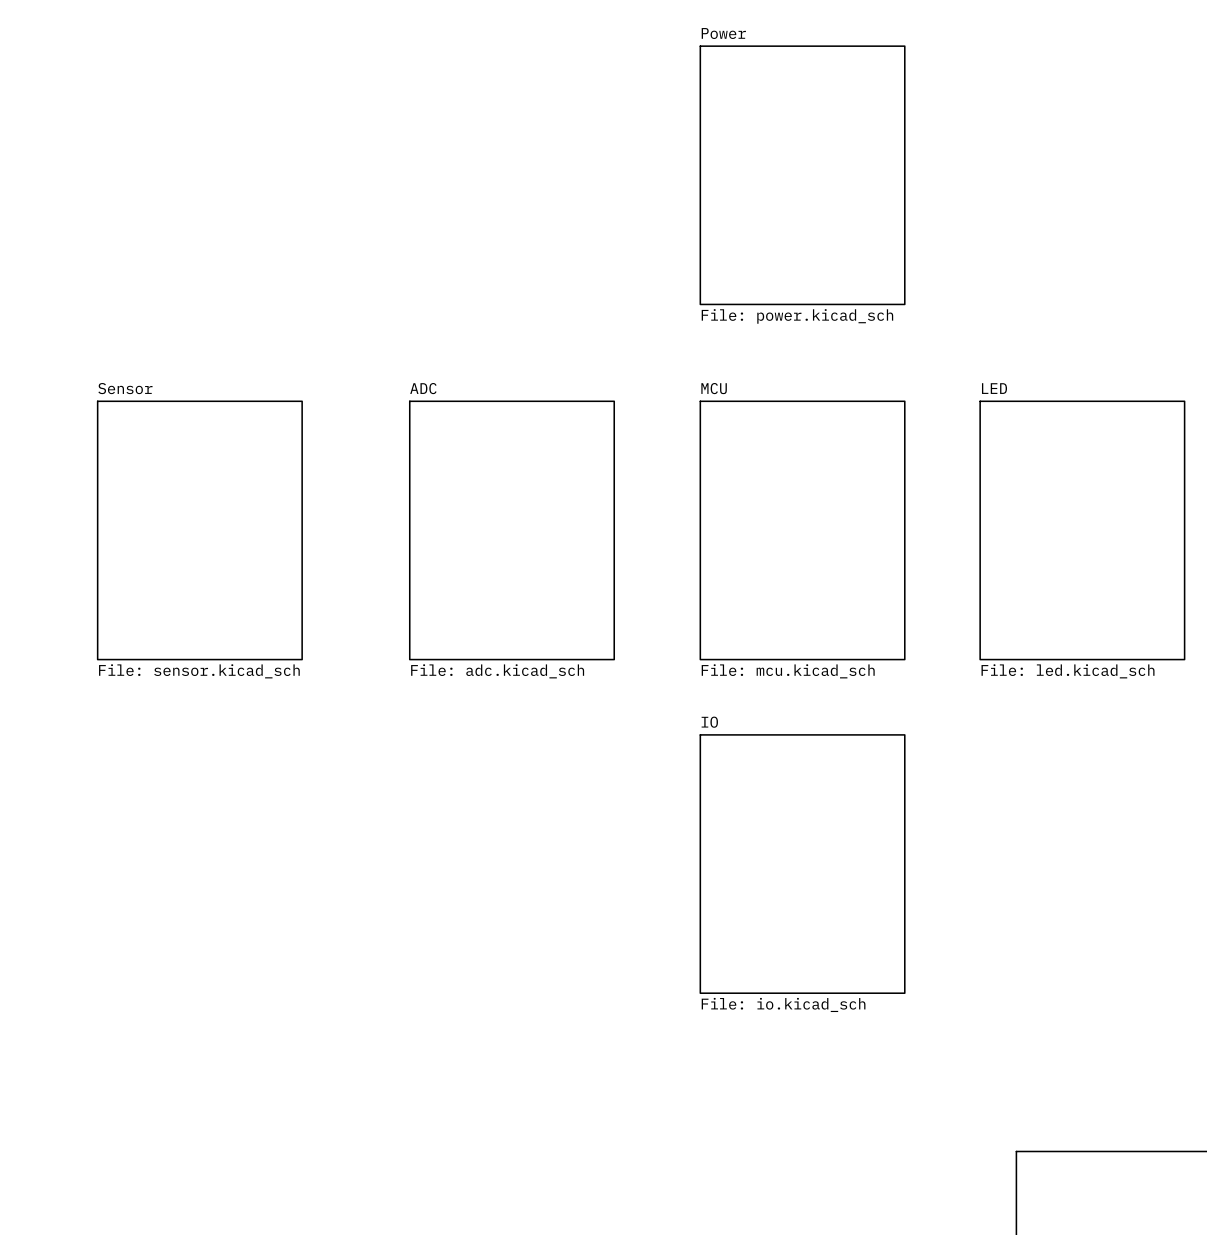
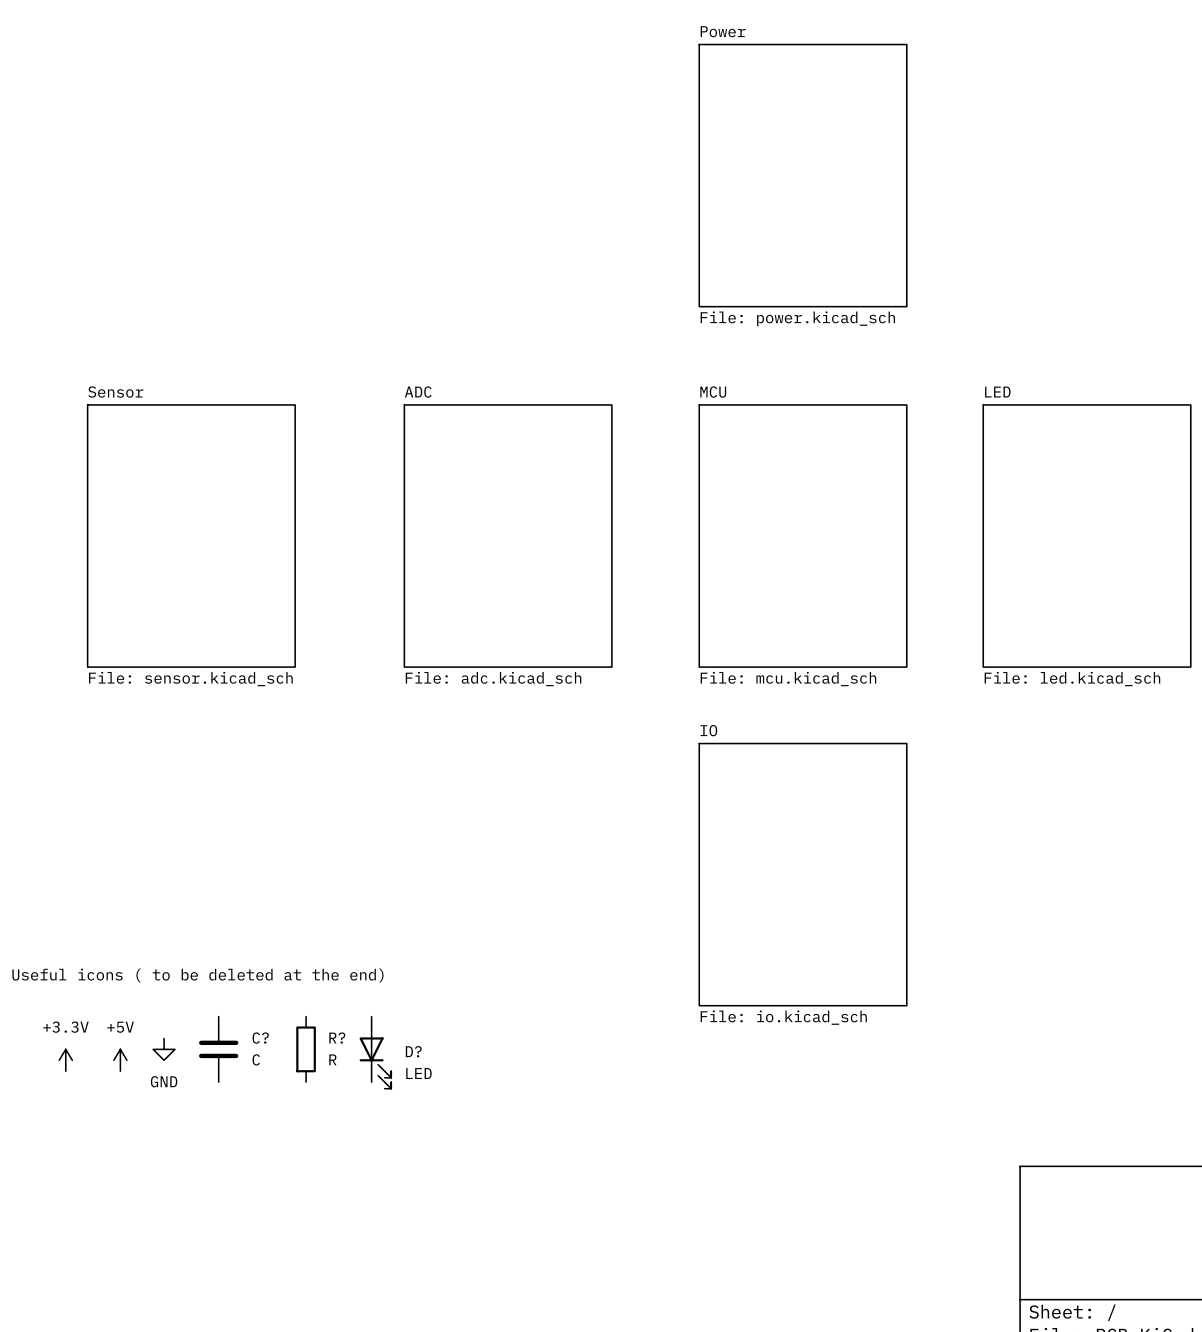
text: none -> Useful icons ( to be deleted at the end) (197, 975)
power symbol: none -> GND (164, 1049)
C?: none -> C (218, 1049)
R?: none -> R (306, 1049)
D?: none -> LED (375, 1052)
power symbol: none -> +3.3V (65, 1060)
power symbol: none -> +5V (120, 1060)

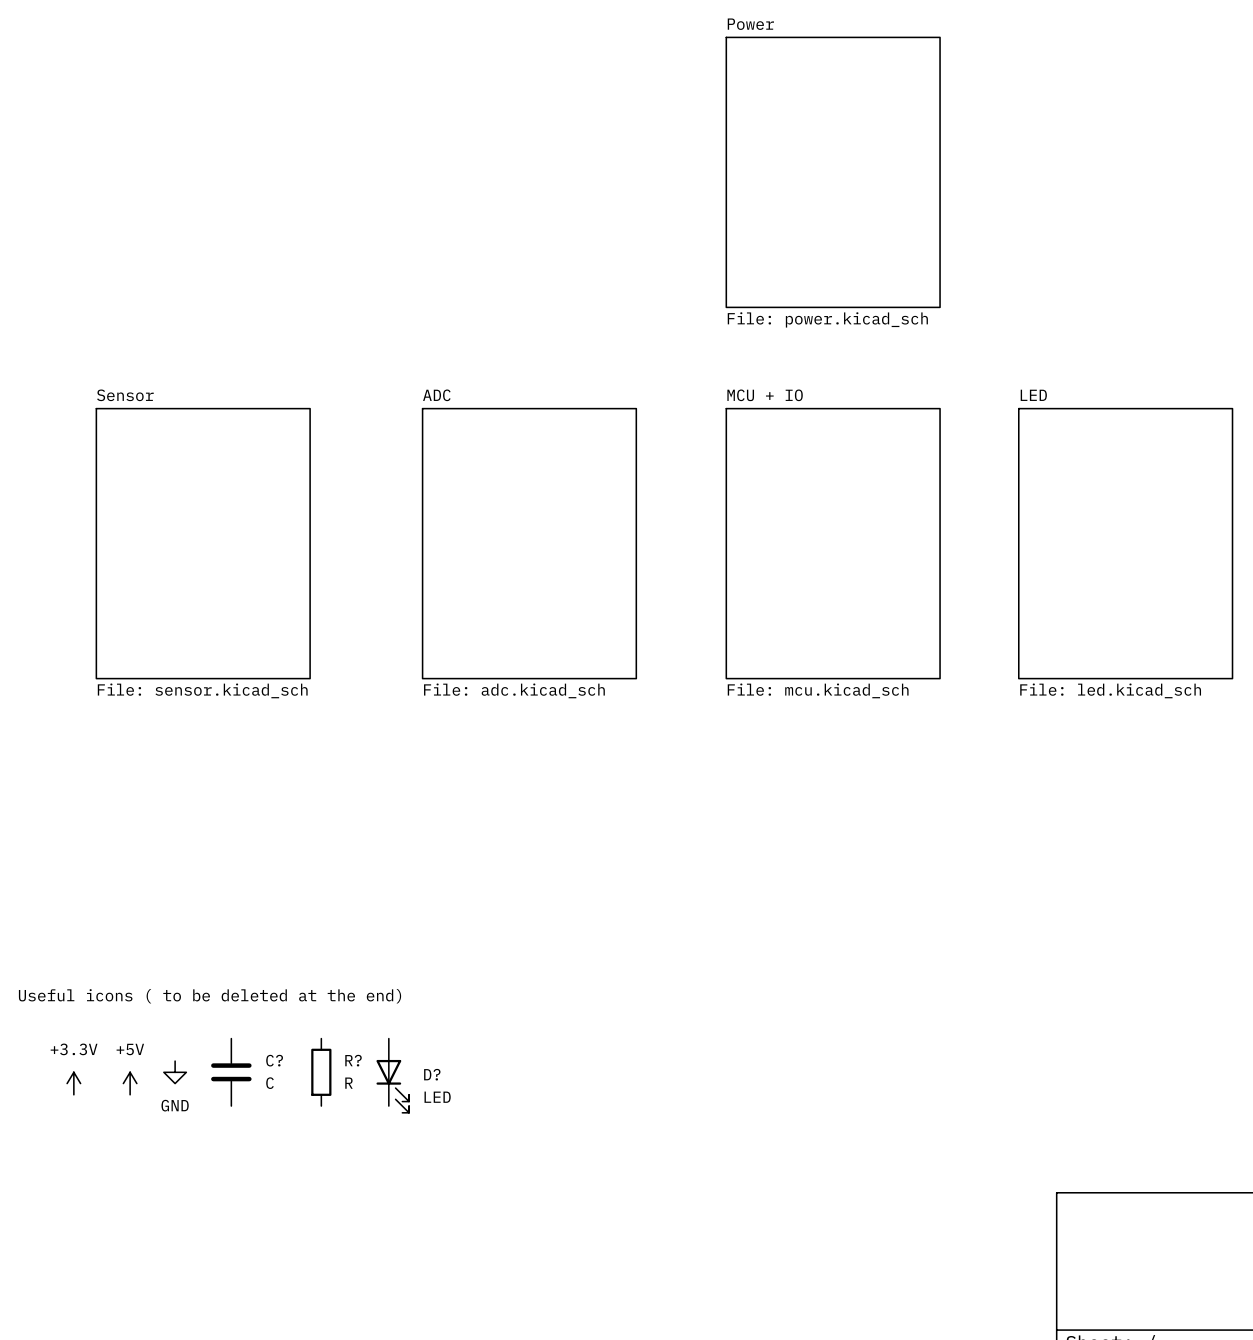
sheet MCU name: MCU (713, 392) -> MCU + IO (765, 395)
sheet IO: File: io.kicad_sch (803, 874) -> none

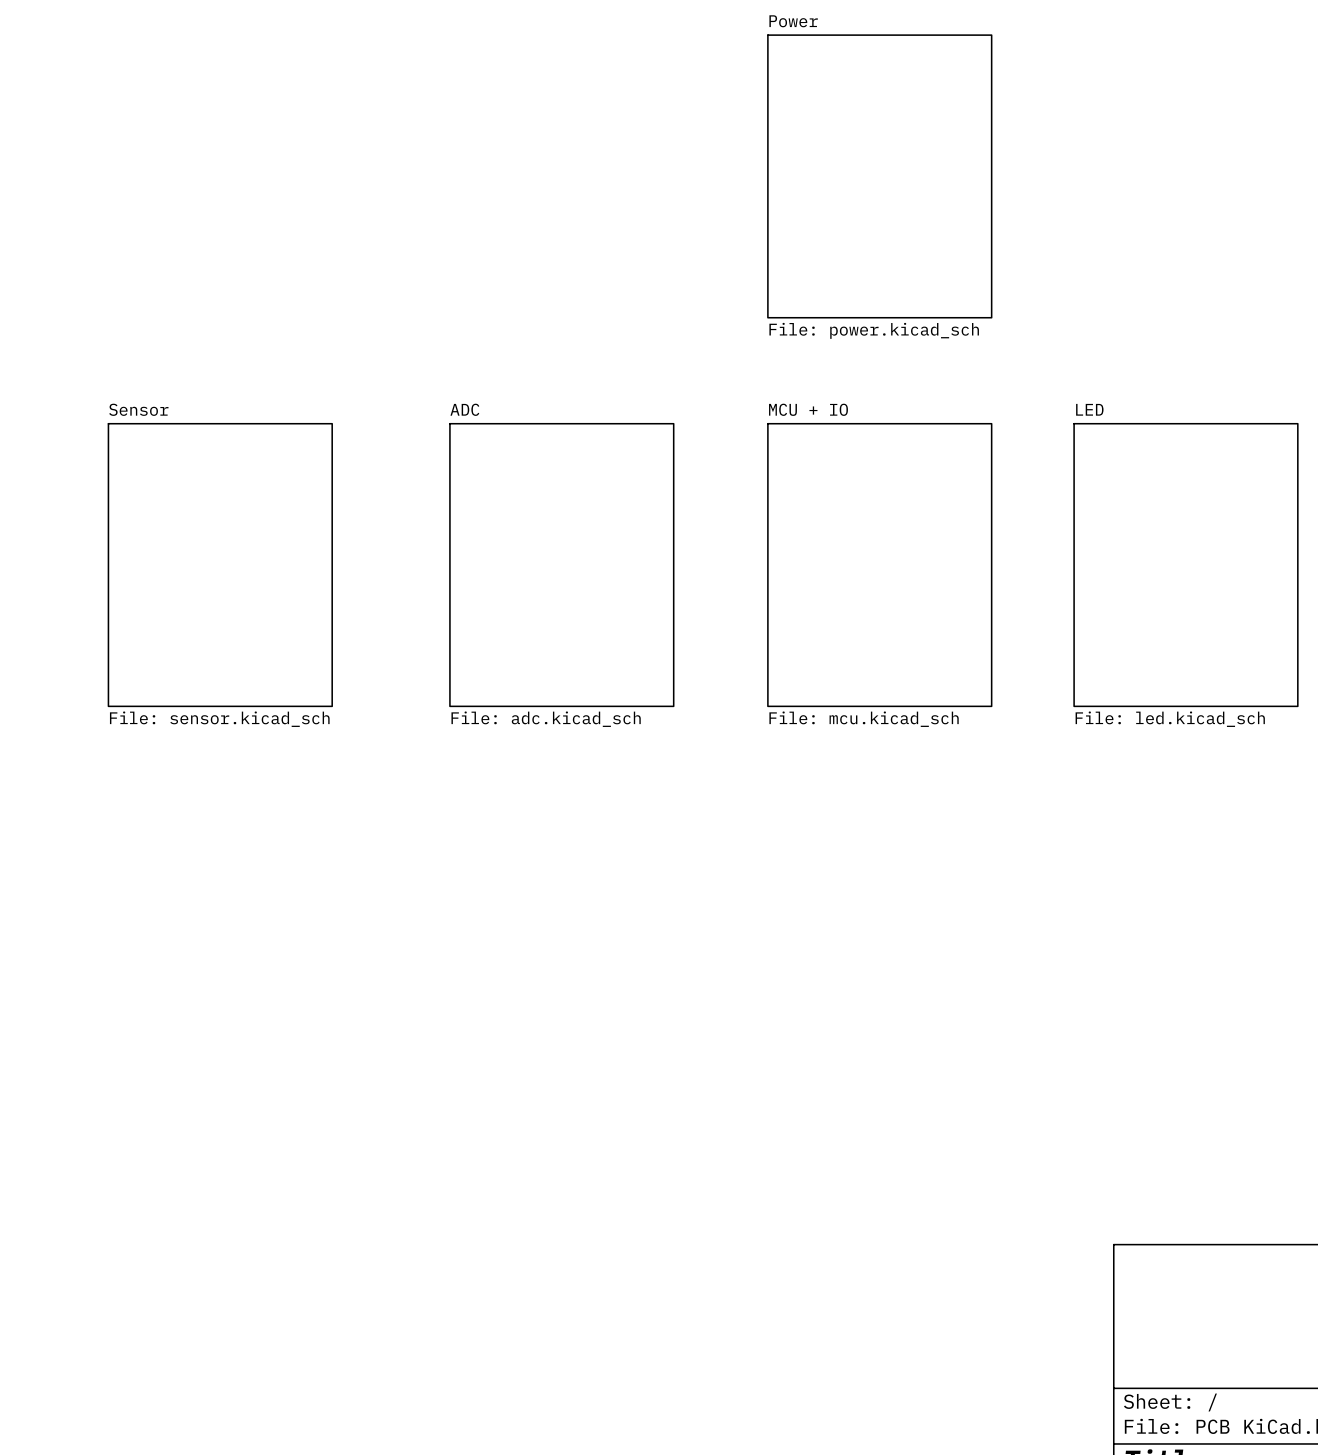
text: Useful icons ( to be deleted at the end) (210, 996) -> none
power symbol: GND (175, 1072) -> none
C?: C (231, 1072) -> none
R?: R (321, 1072) -> none
D?: LED (392, 1075) -> none
power symbol: +3.3V (73, 1083) -> none
power symbol: +5V (130, 1083) -> none

